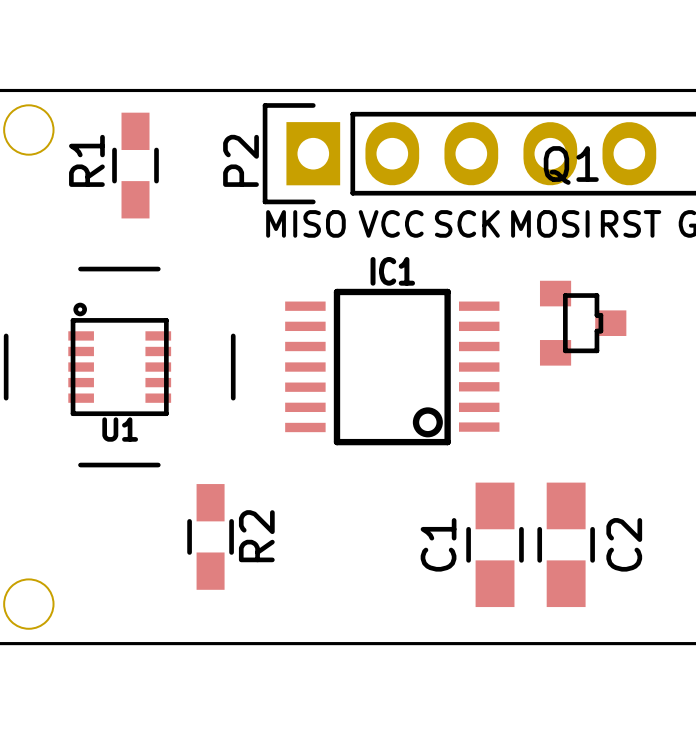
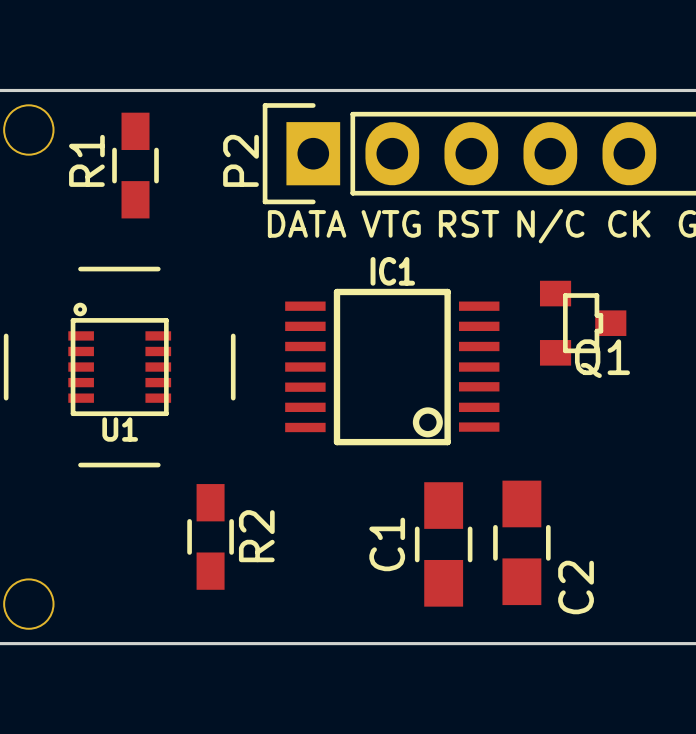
Q1 name position: Q1 (571, 165) -> Q1 (602, 358)
text: MISO (305, 223) -> DATA (307, 223)
text: VCC (391, 223) -> VTG (391, 223)
text: SCK (467, 223) -> RST (469, 223)
text: MOSI (550, 223) -> N/C (550, 226)
text: RST (631, 223) -> CK (629, 223)
C1 position: (495, 544) -> (443, 544)
C2 position: (566, 544) -> (521, 542)
C2 name position: C2 (624, 544) -> C2 (576, 587)

